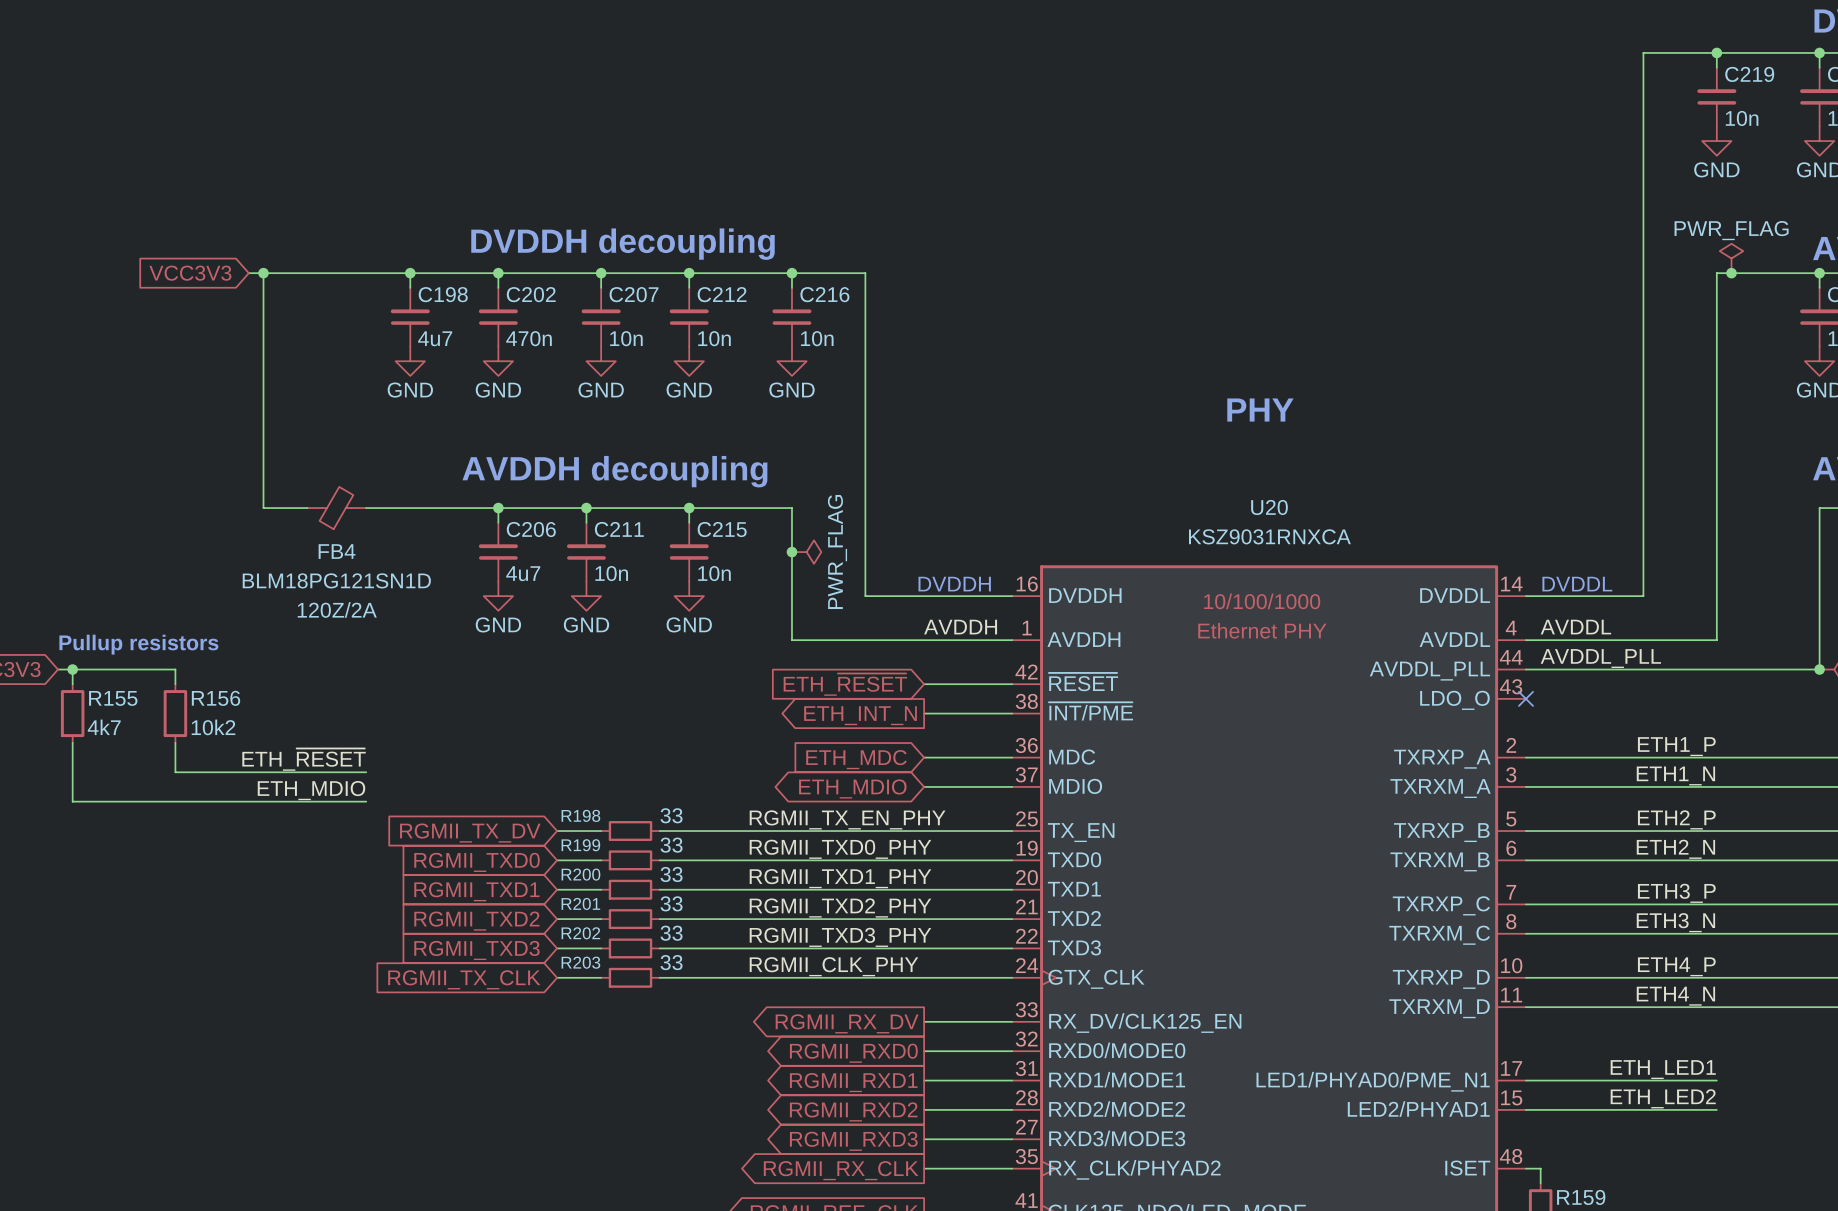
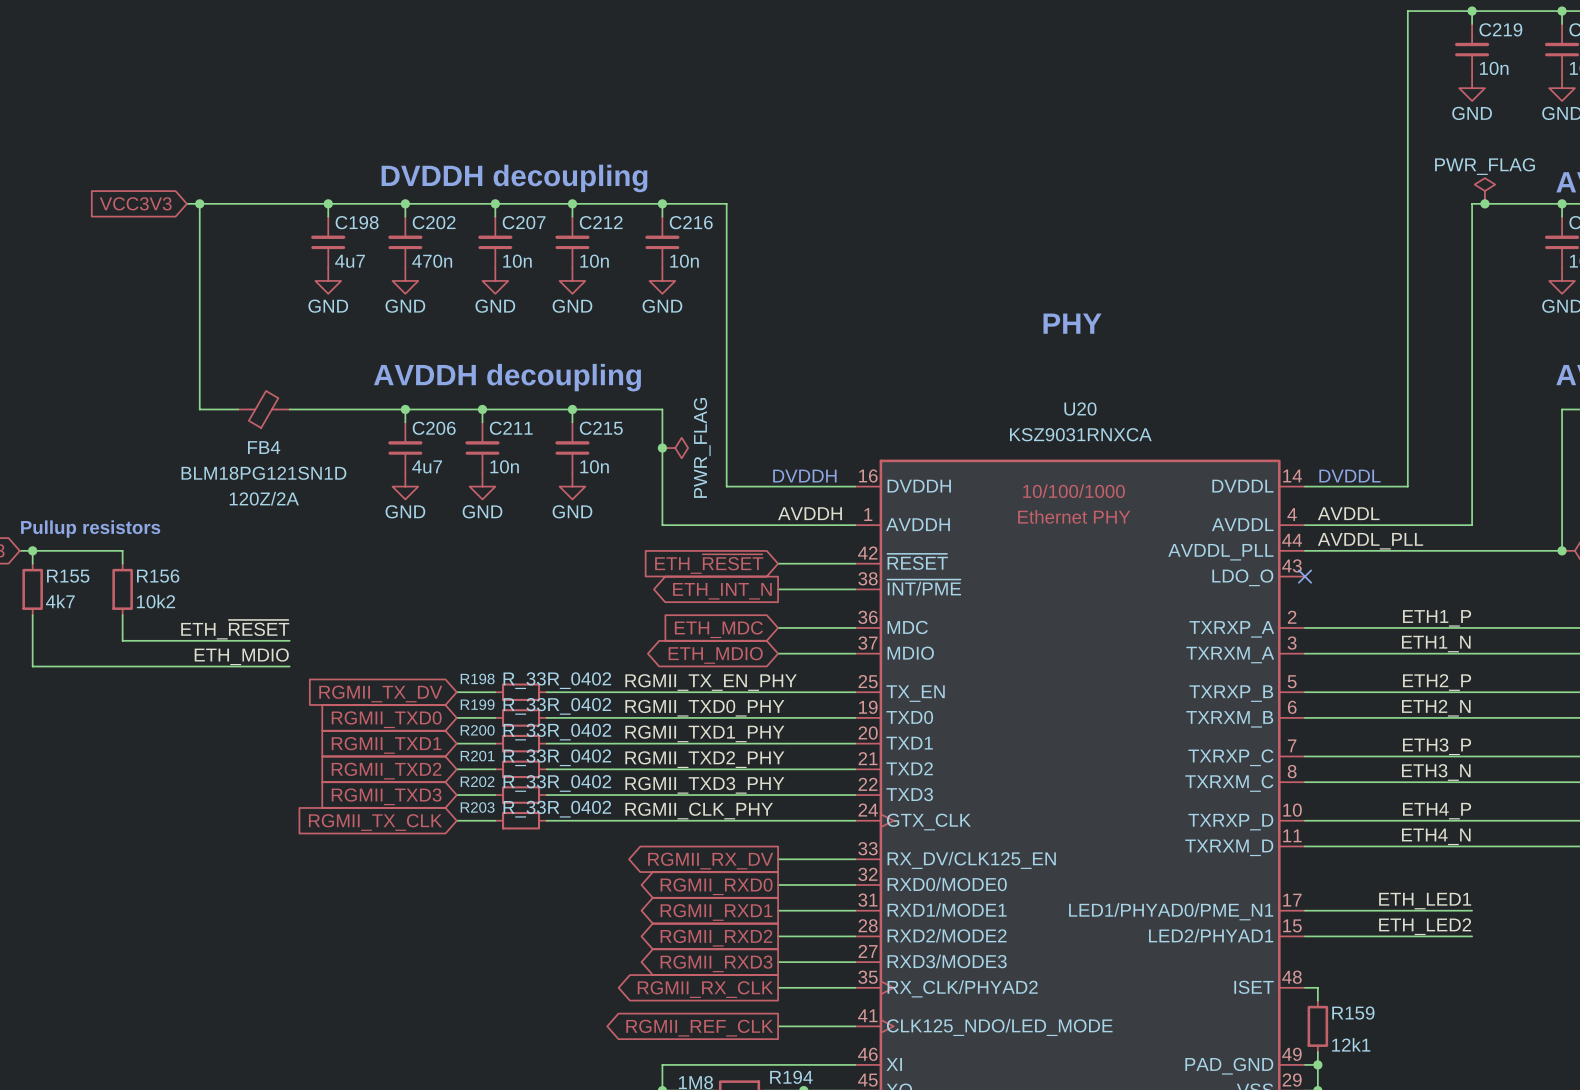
R198 value: 33 (671, 815) -> R_33R_0402 (557, 680)
R199 value: 33 (671, 845) -> R_33R_0402 (557, 706)
R200 value: 33 (671, 874) -> R_33R_0402 (557, 732)
R201 value: 33 (671, 903) -> R_33R_0402 (557, 757)
R202 value: 33 (671, 933) -> R_33R_0402 (557, 783)
R203 value: 33 (671, 962) -> R_33R_0402 (557, 809)

